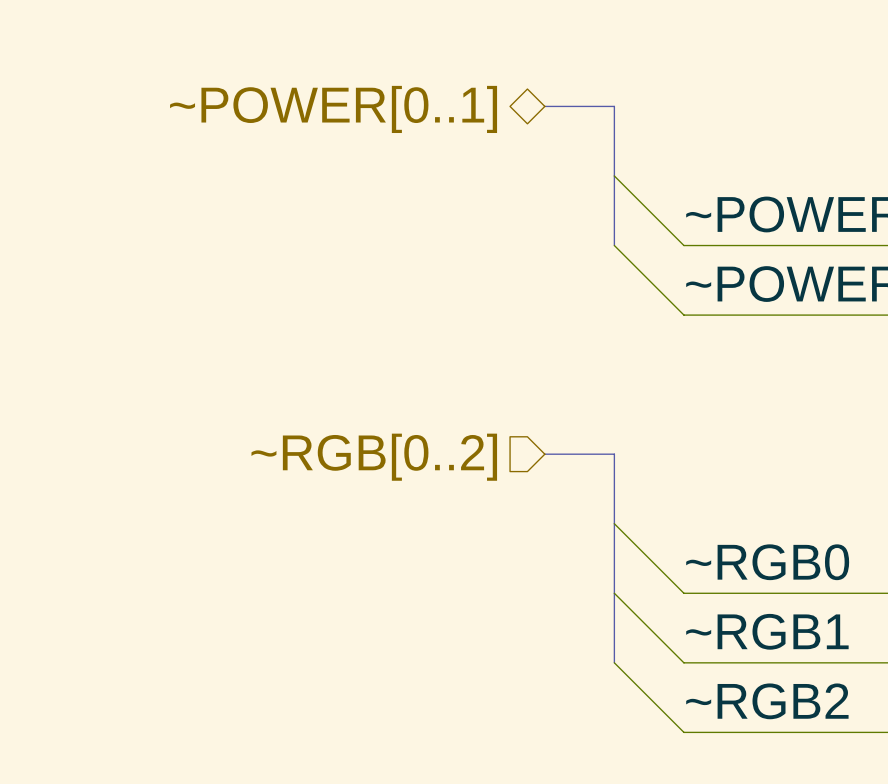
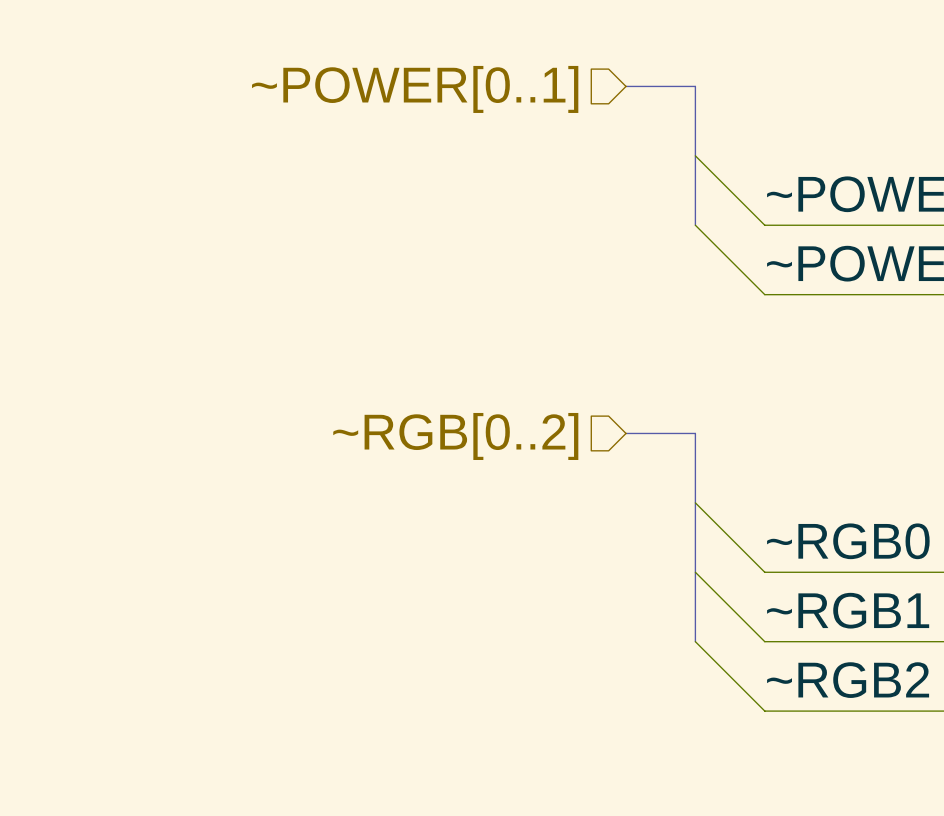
hierarchical label shape: bidirectional (333, 109) -> input (415, 89)

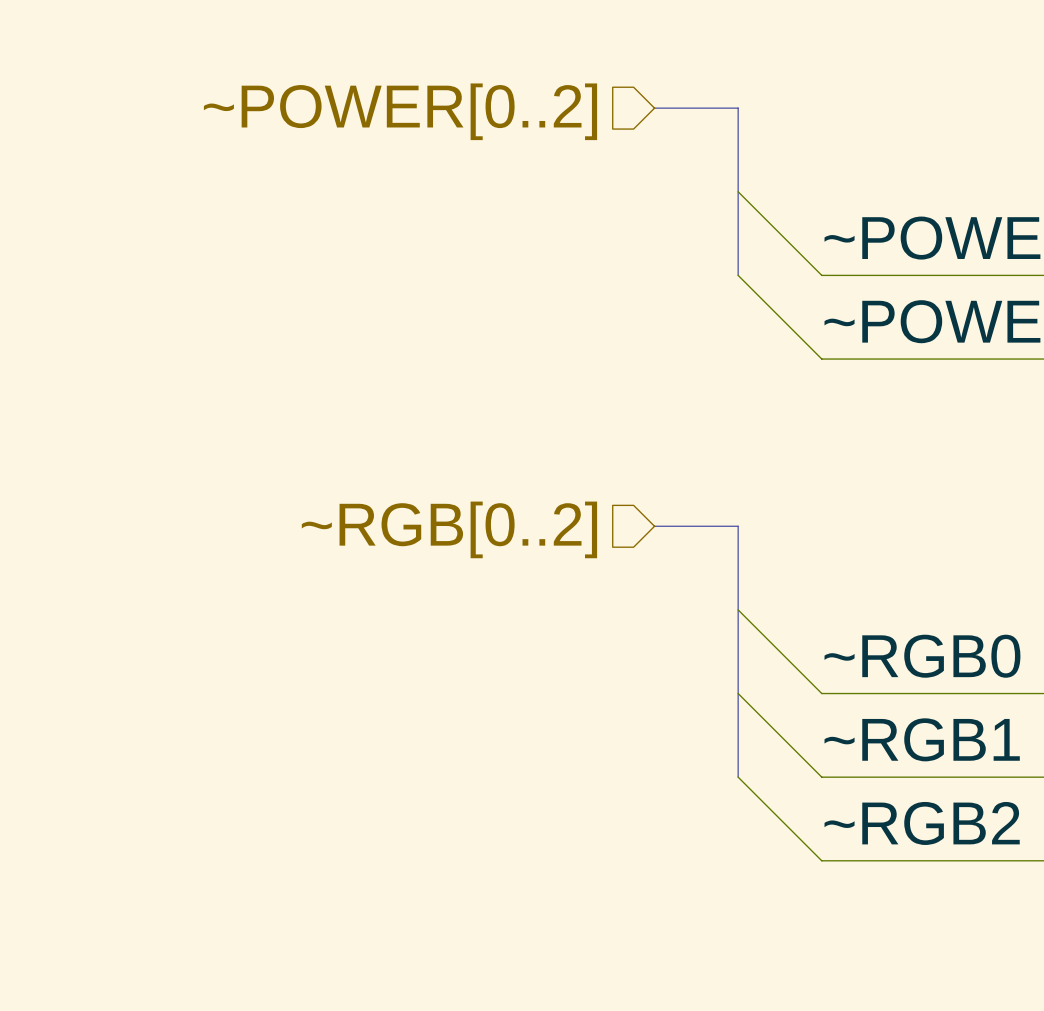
hierarchical label: ~POWER[0..1] (415, 89) -> ~POWER[0..2] (400, 111)

